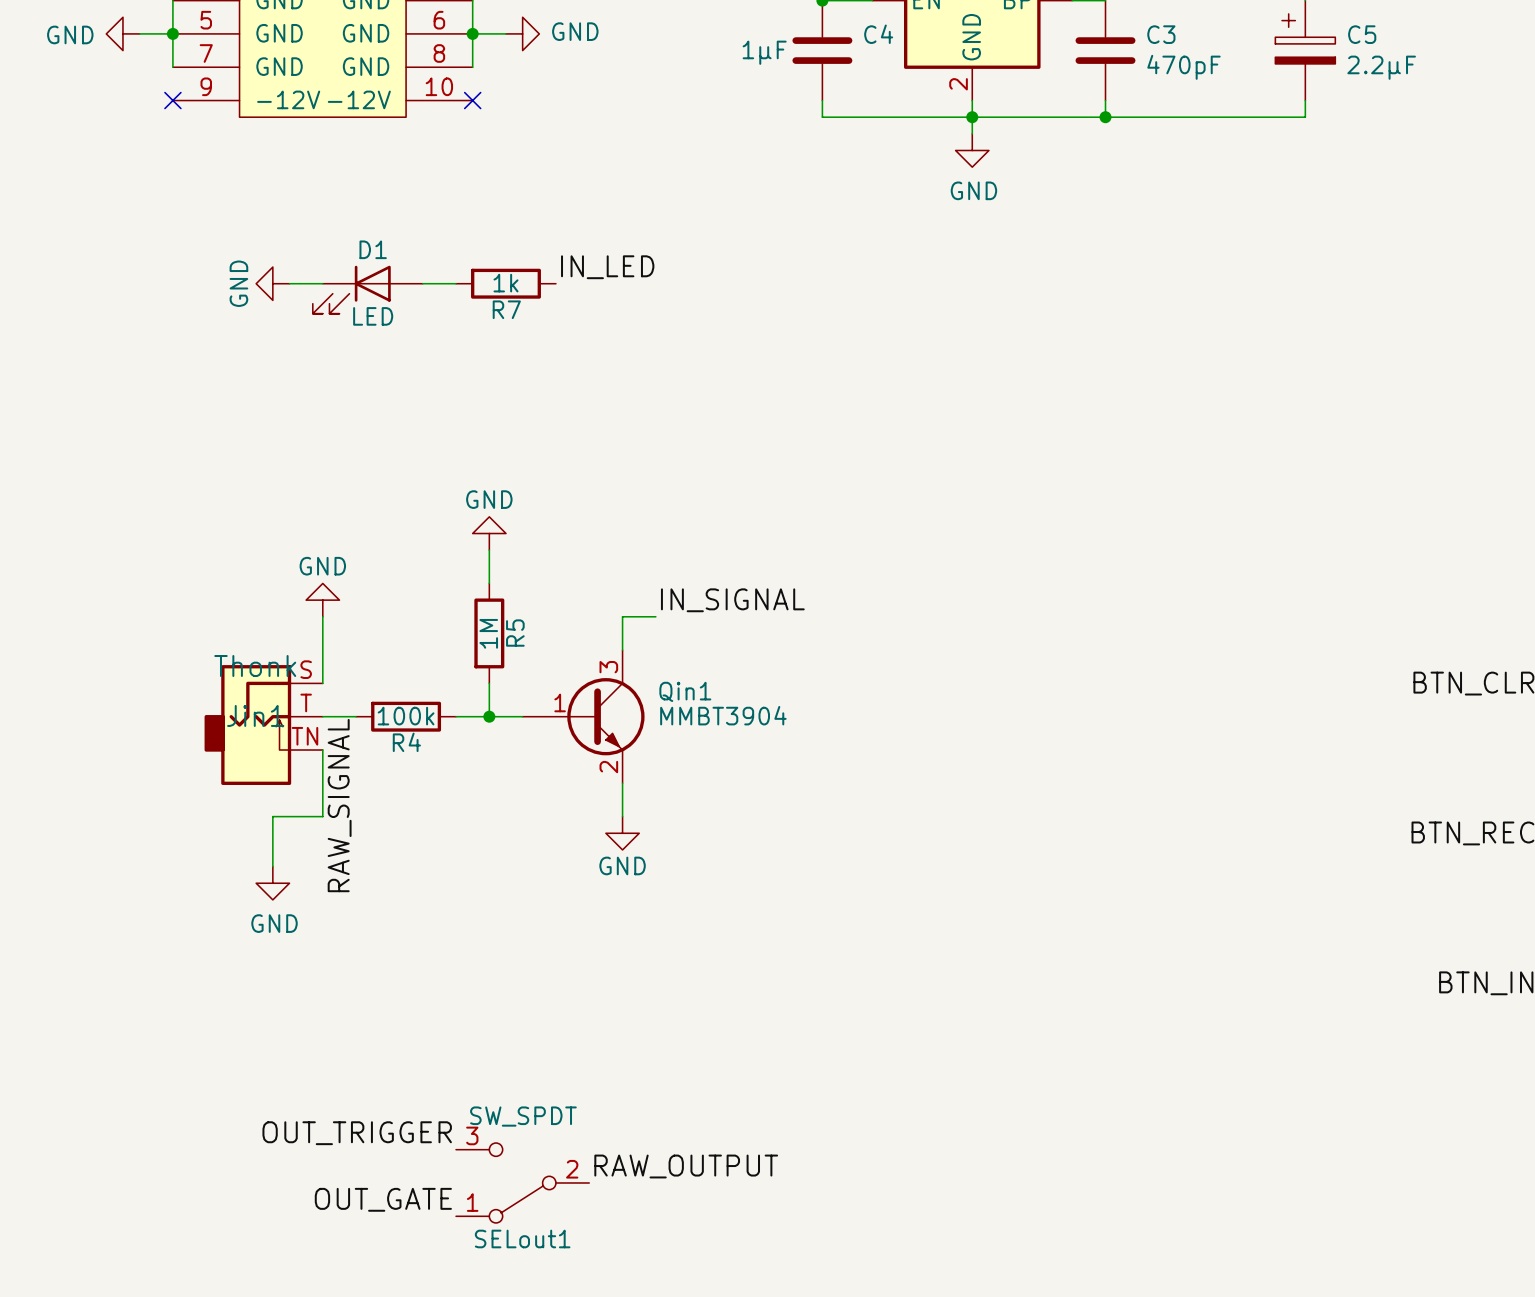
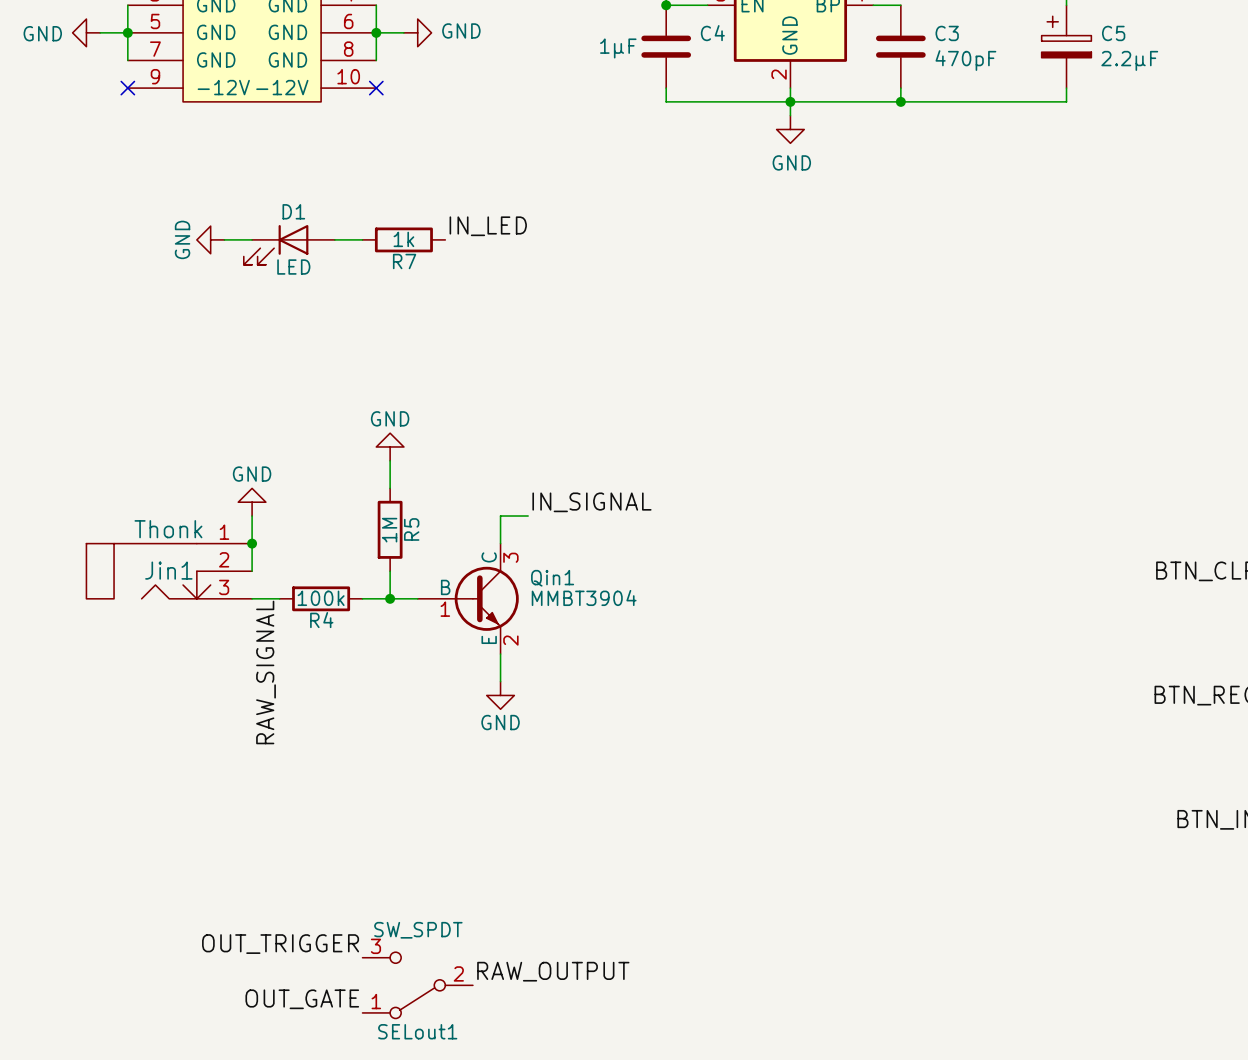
junction: none -> (252, 543)
Qin1 symbol: [522, 650, 645, 784] -> [417, 543, 519, 655]
Jin1 symbol: [204, 665, 323, 785] -> [86, 543, 253, 599]
wire: (322, 750) (322, 816) (272, 816) (272, 866) -> none
power symbol: GND (272, 883) -> none

